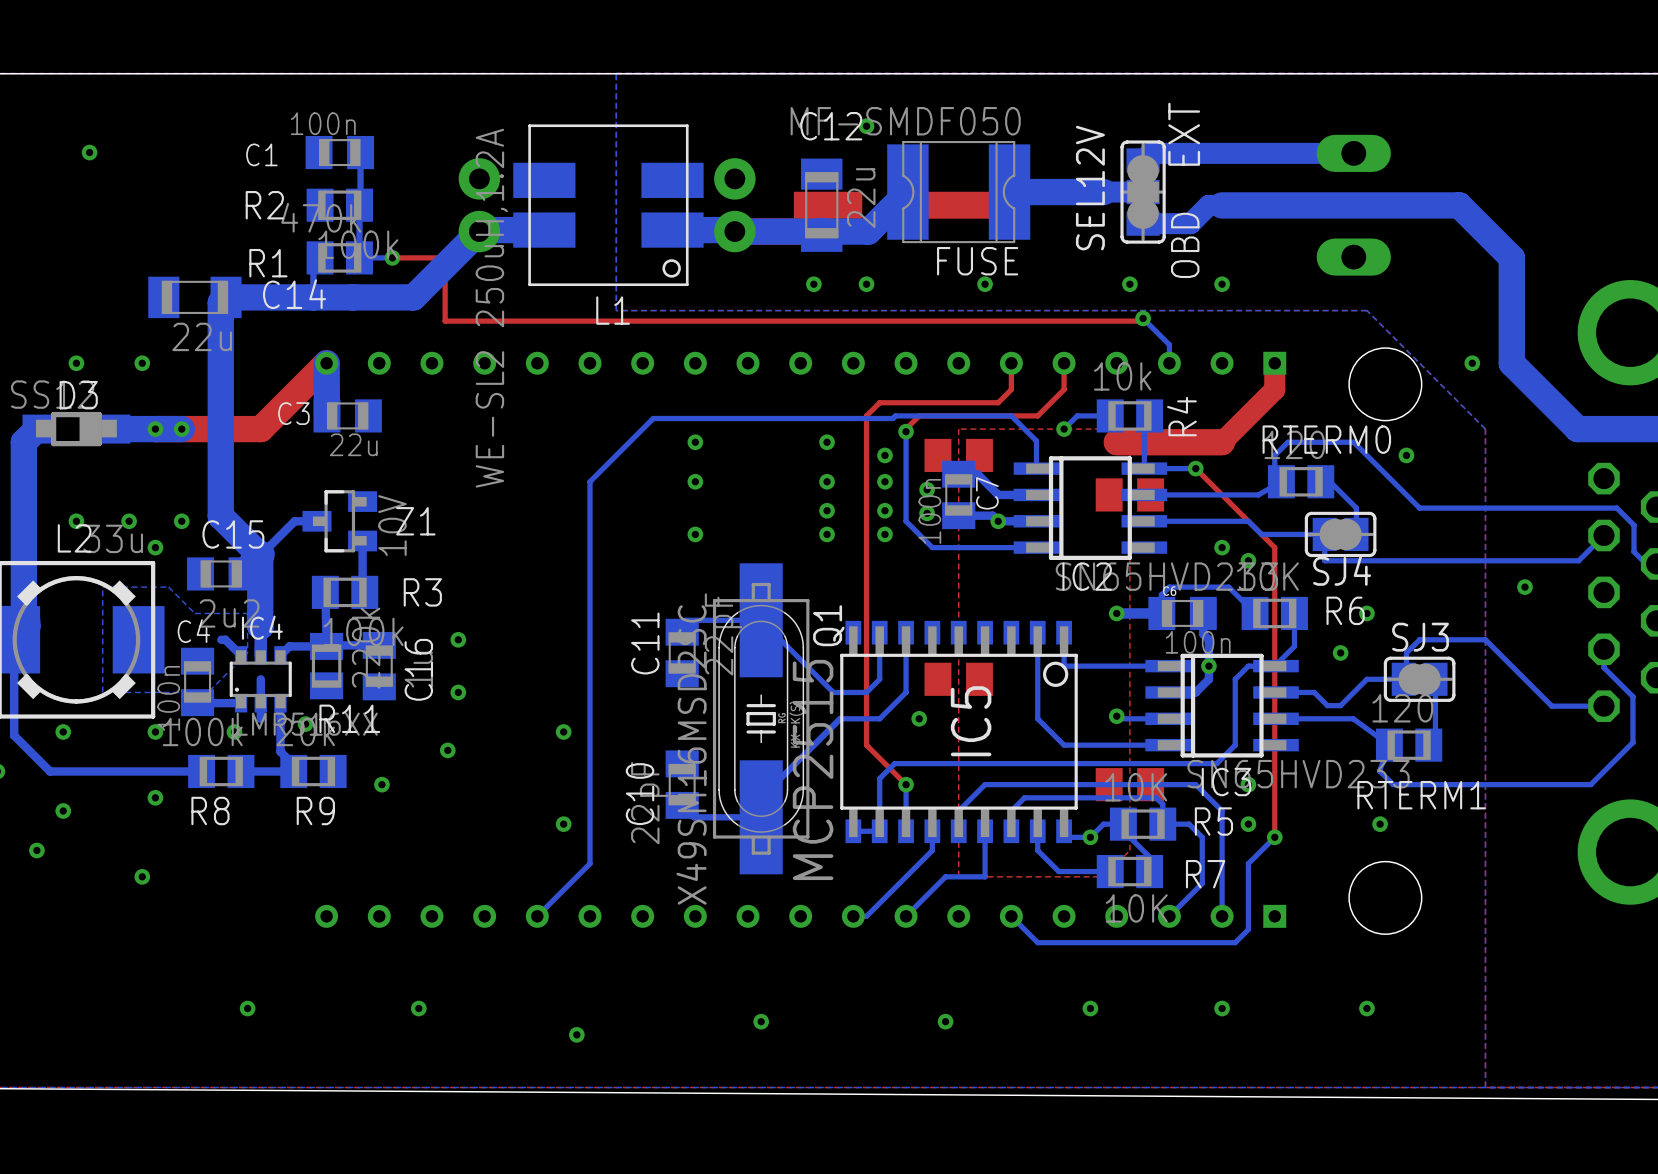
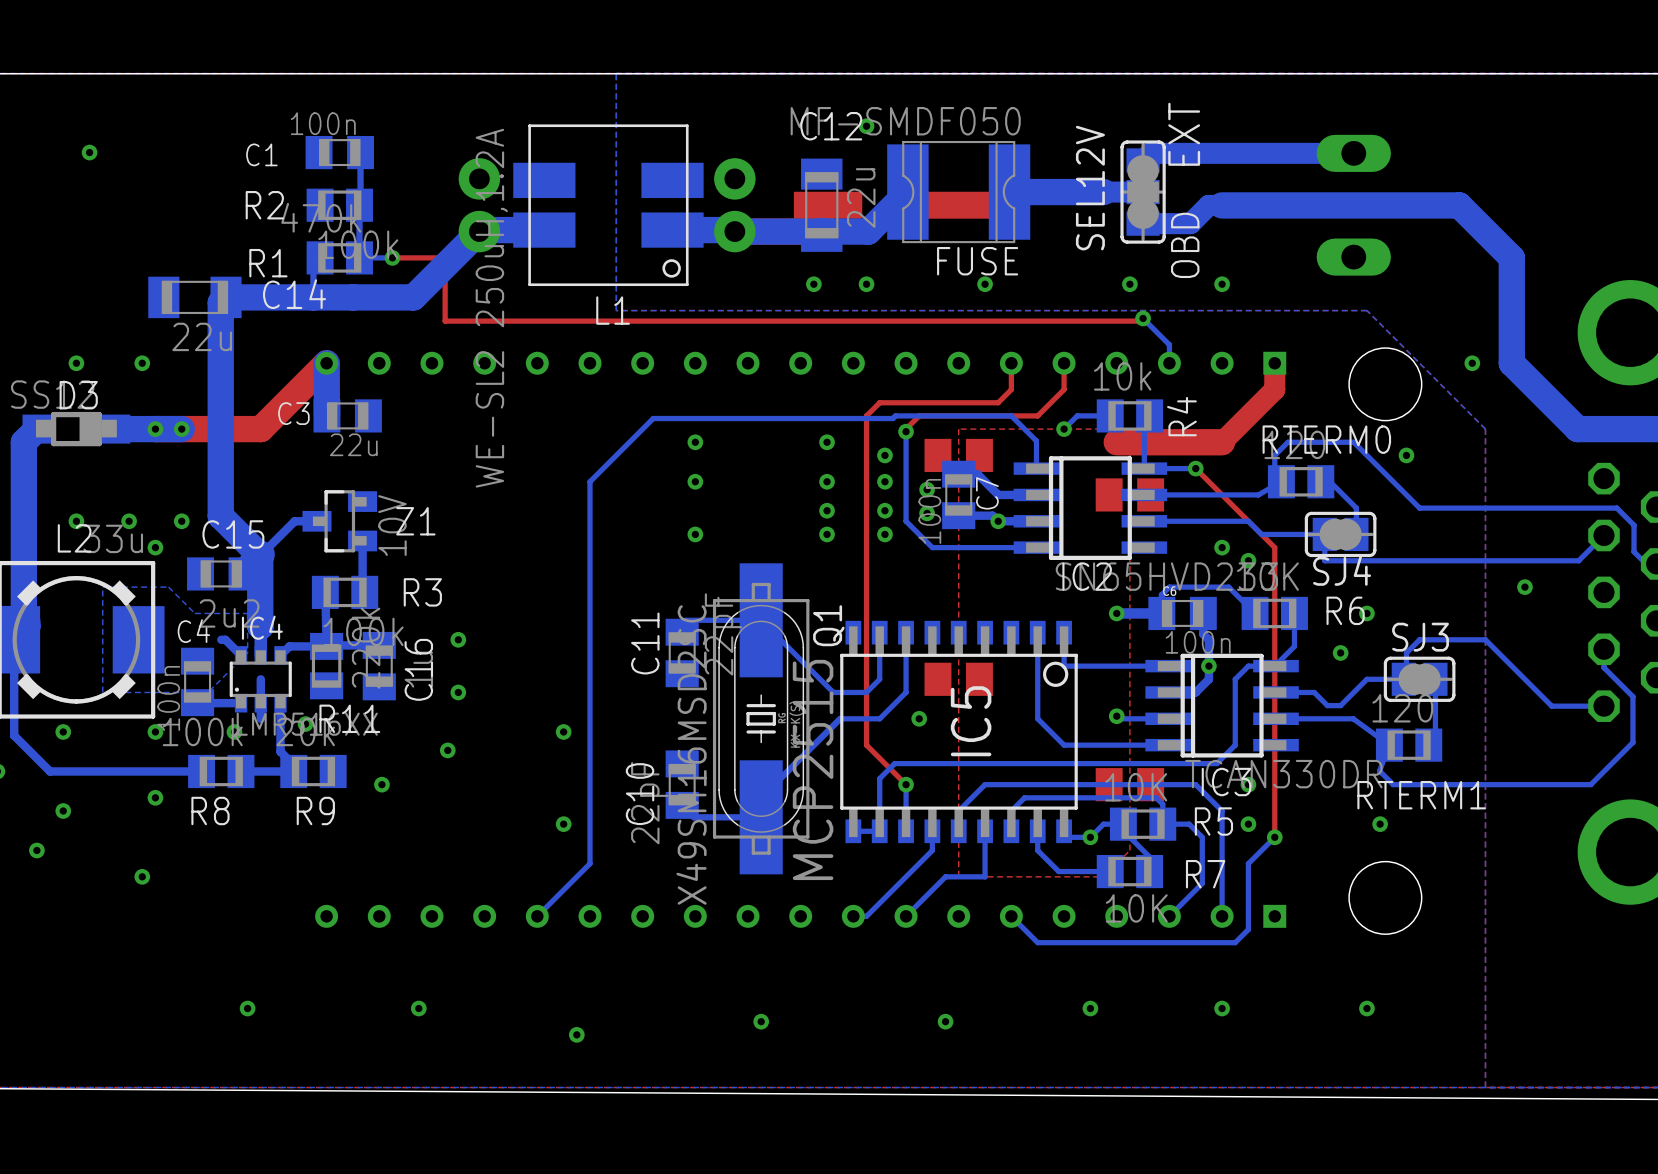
IC3 value: SN65HVD233 (1298, 774) -> TCAN330DR (1283, 774)

